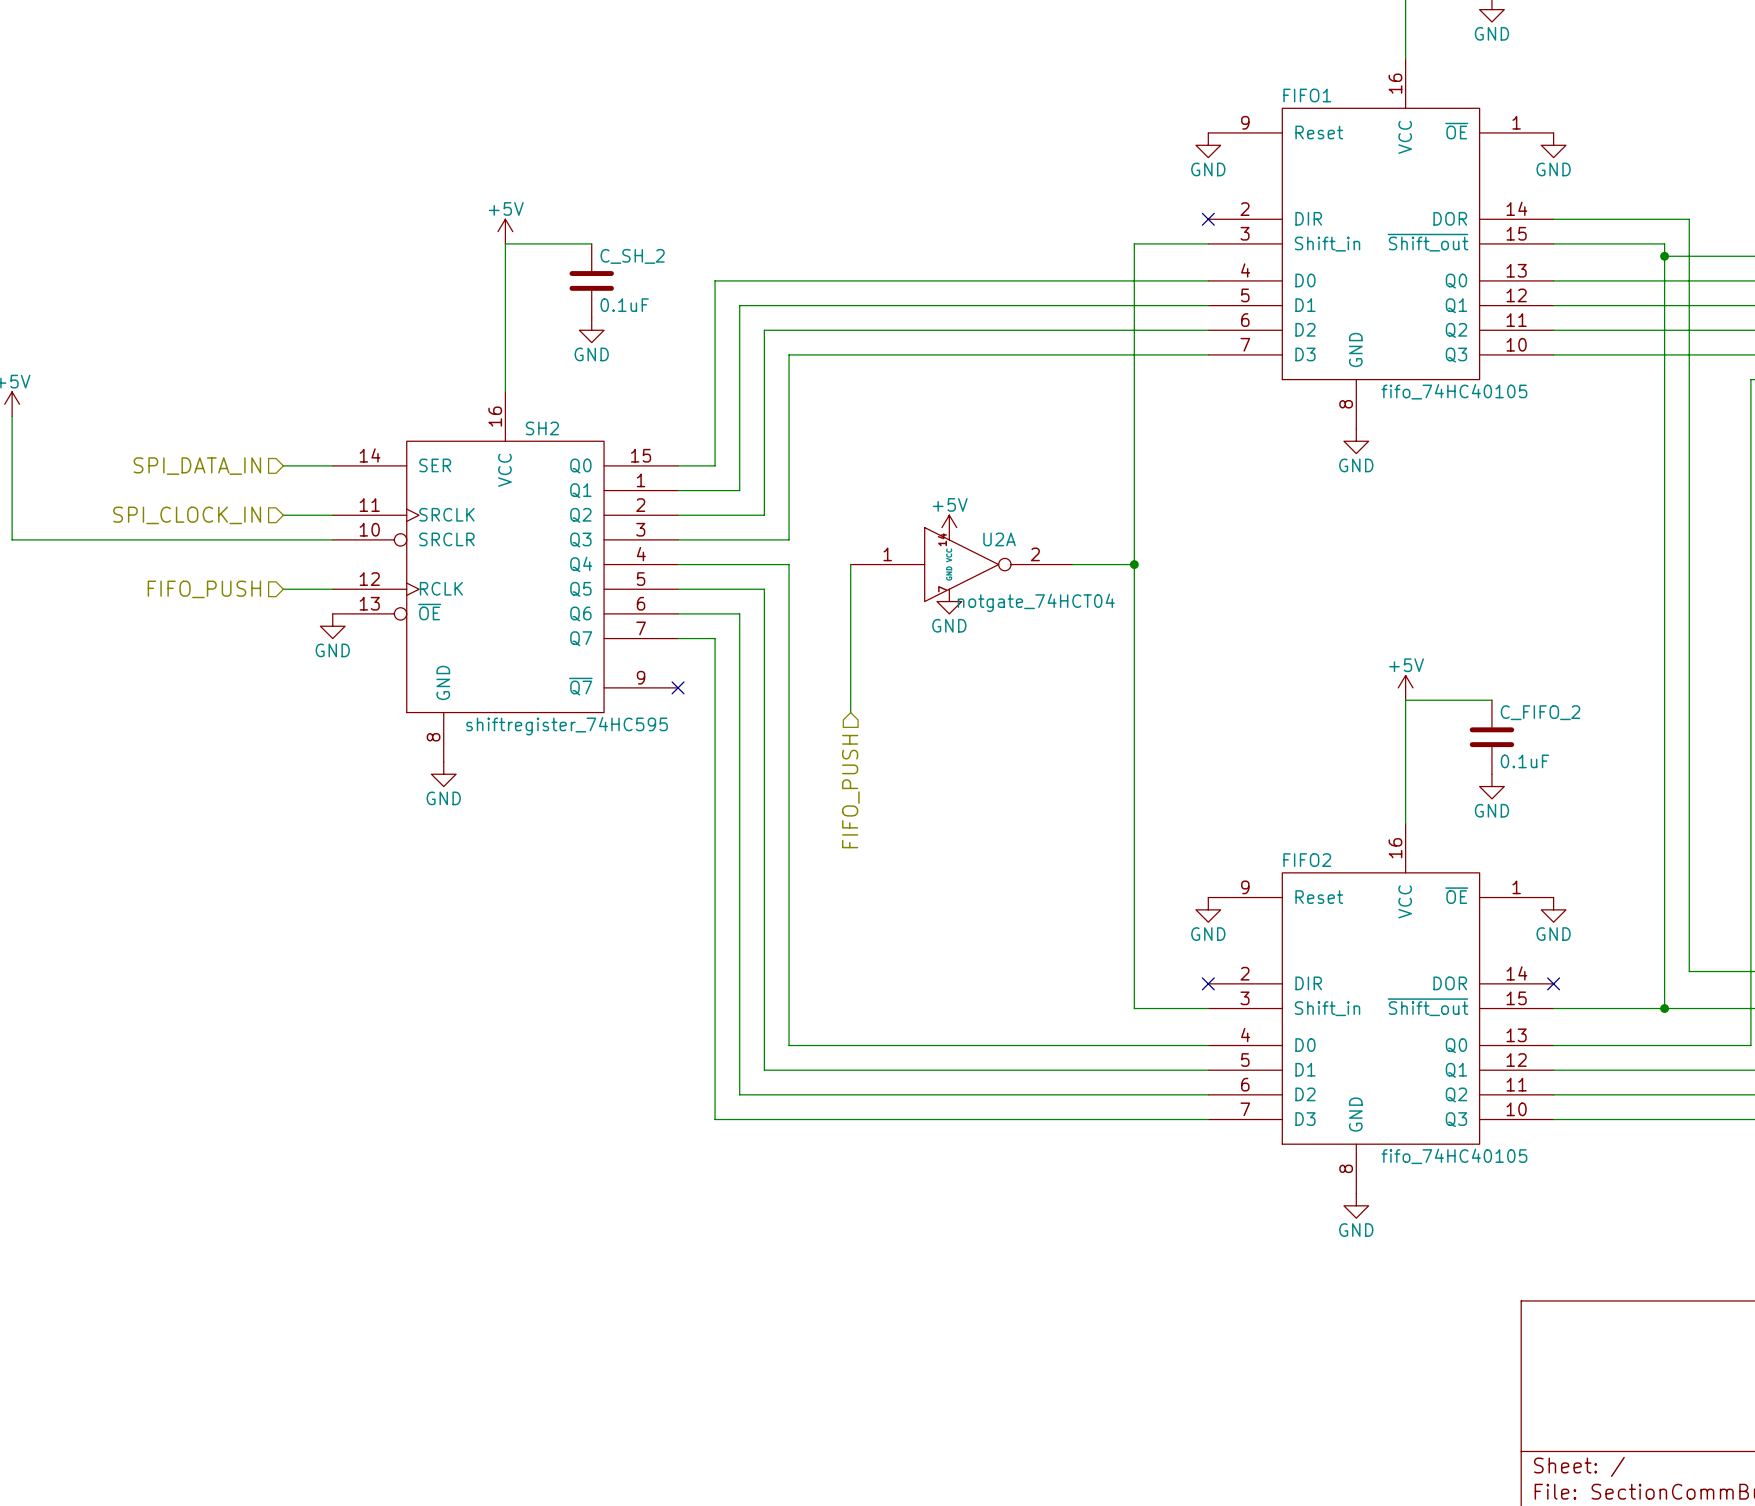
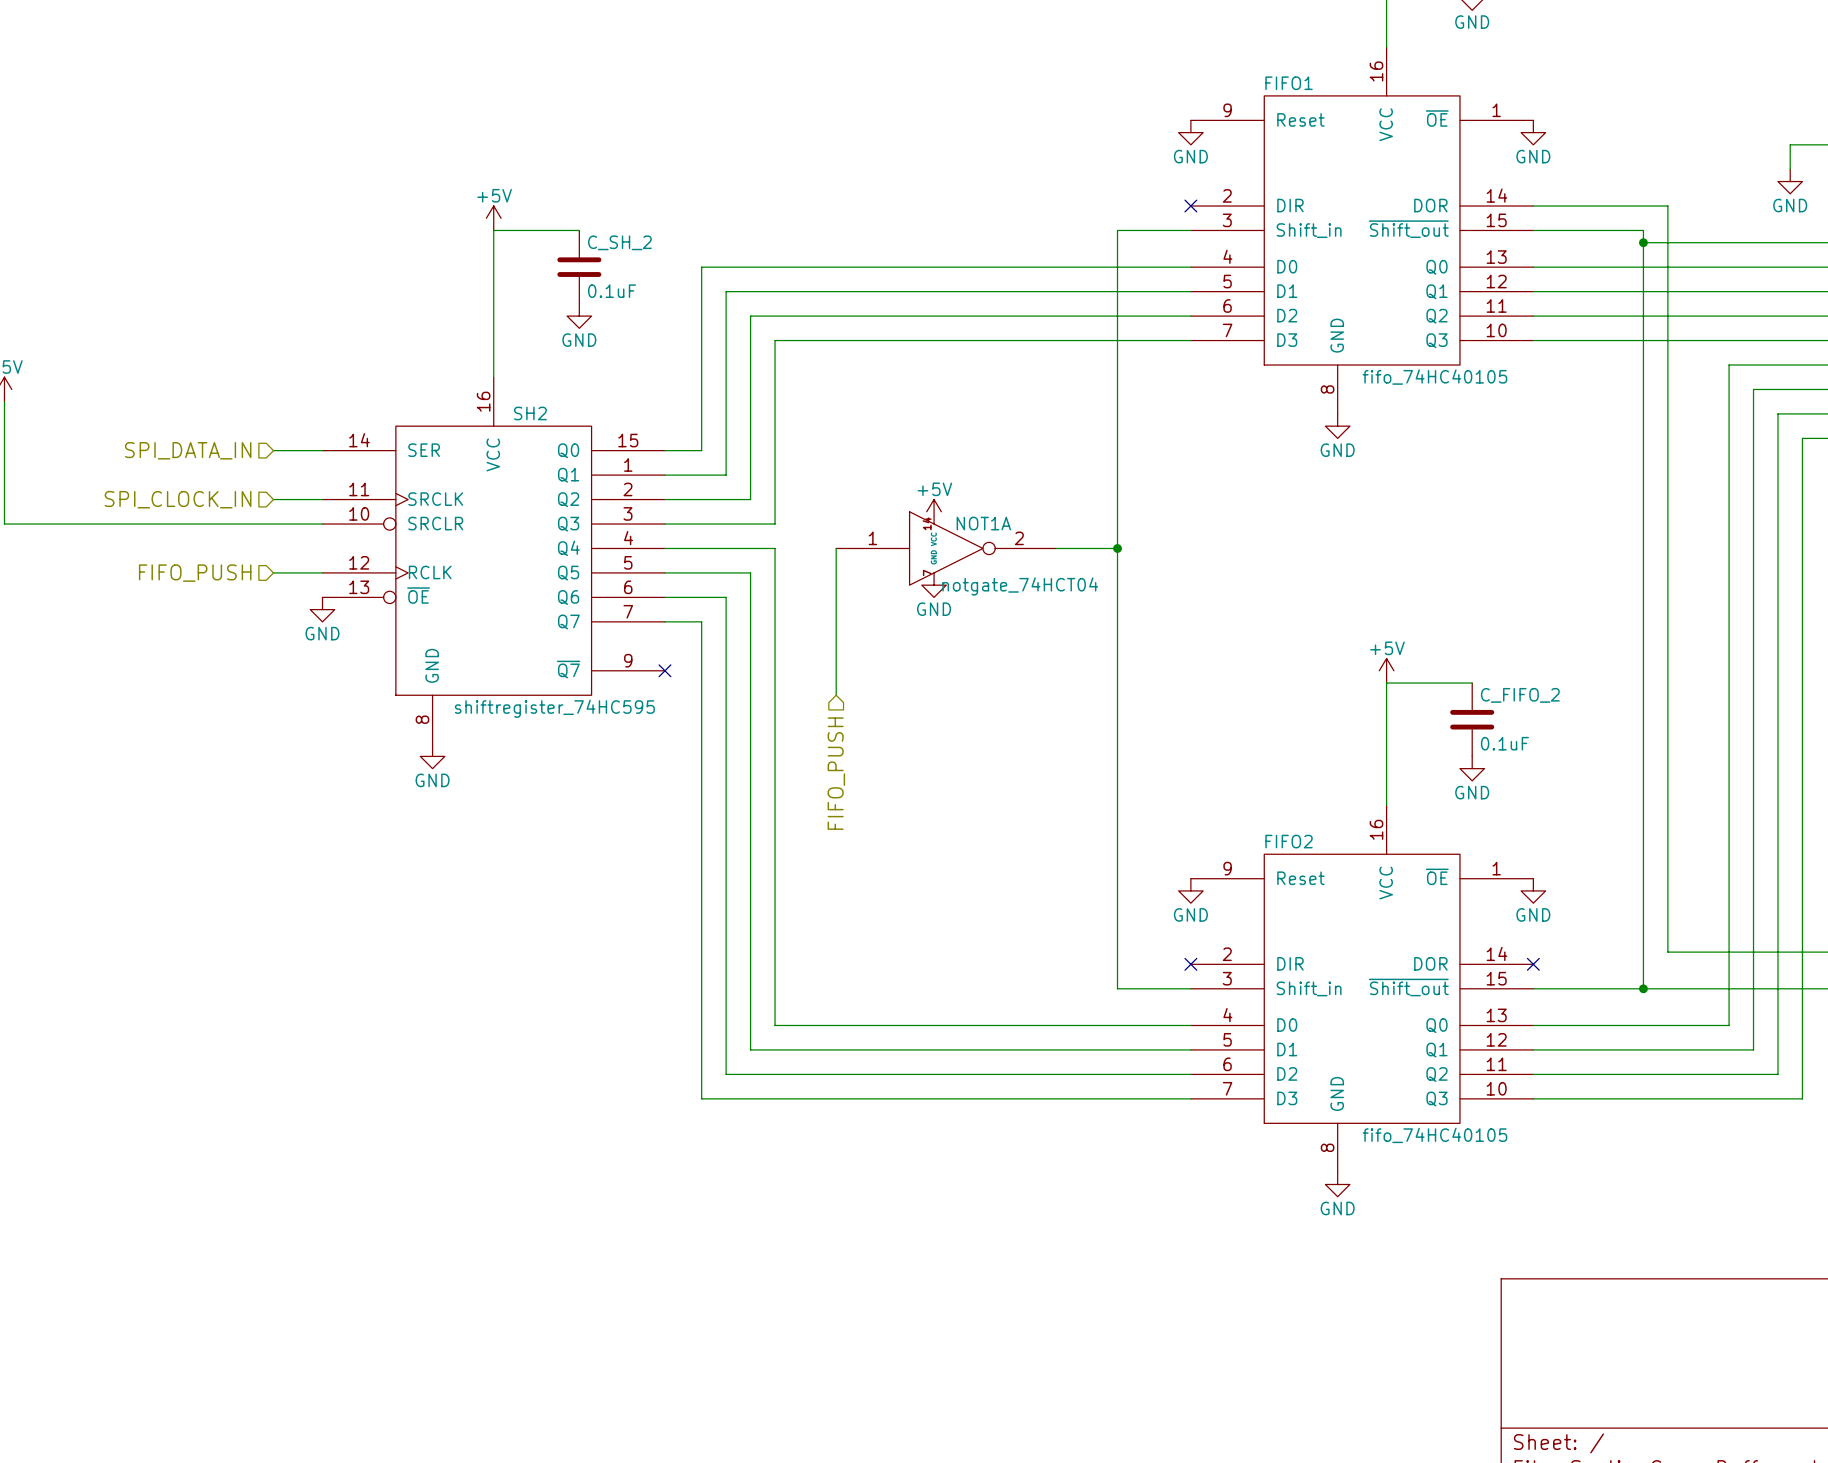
U2A name: U2A (999, 539) -> NOT1A (983, 523)

